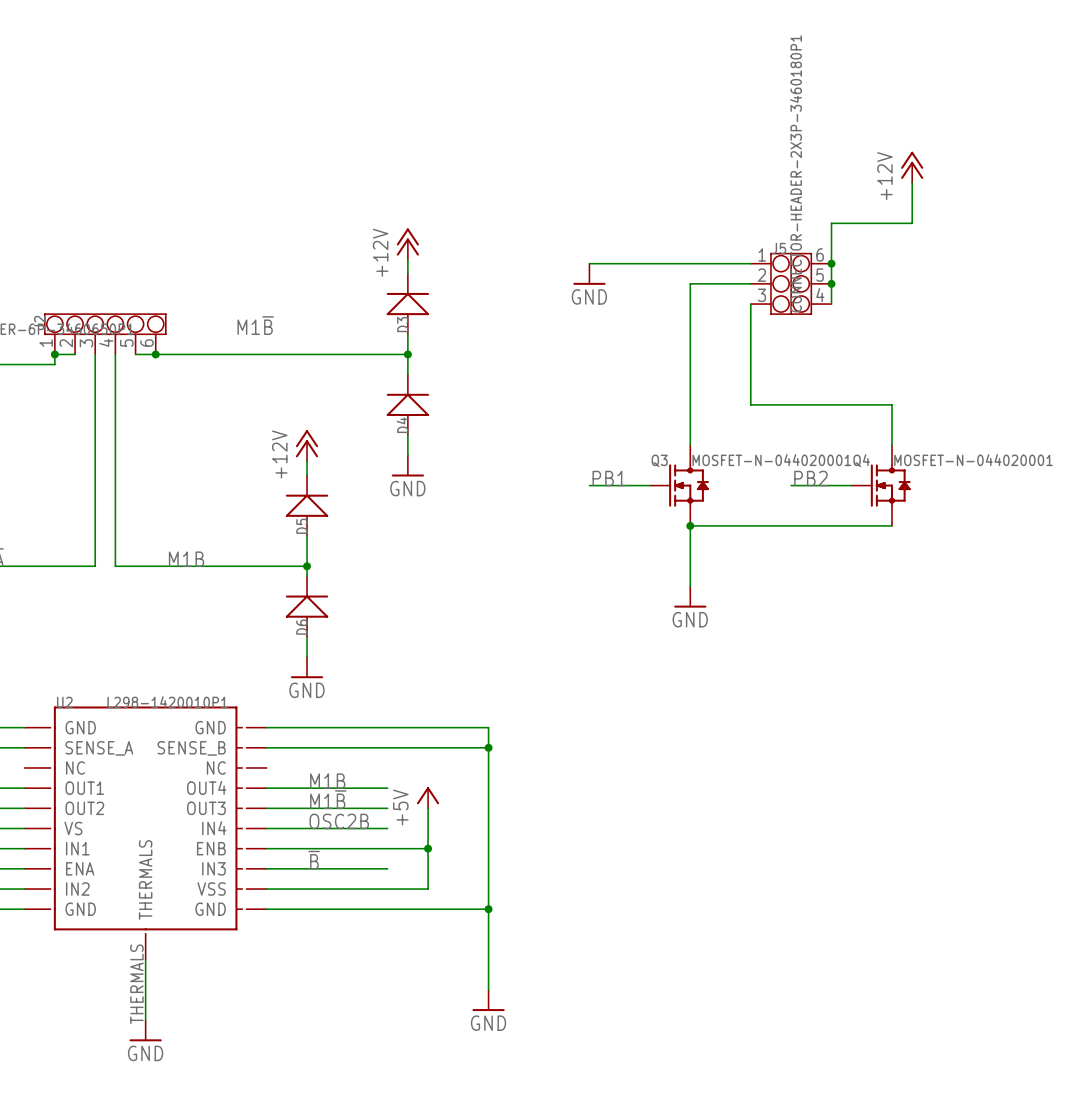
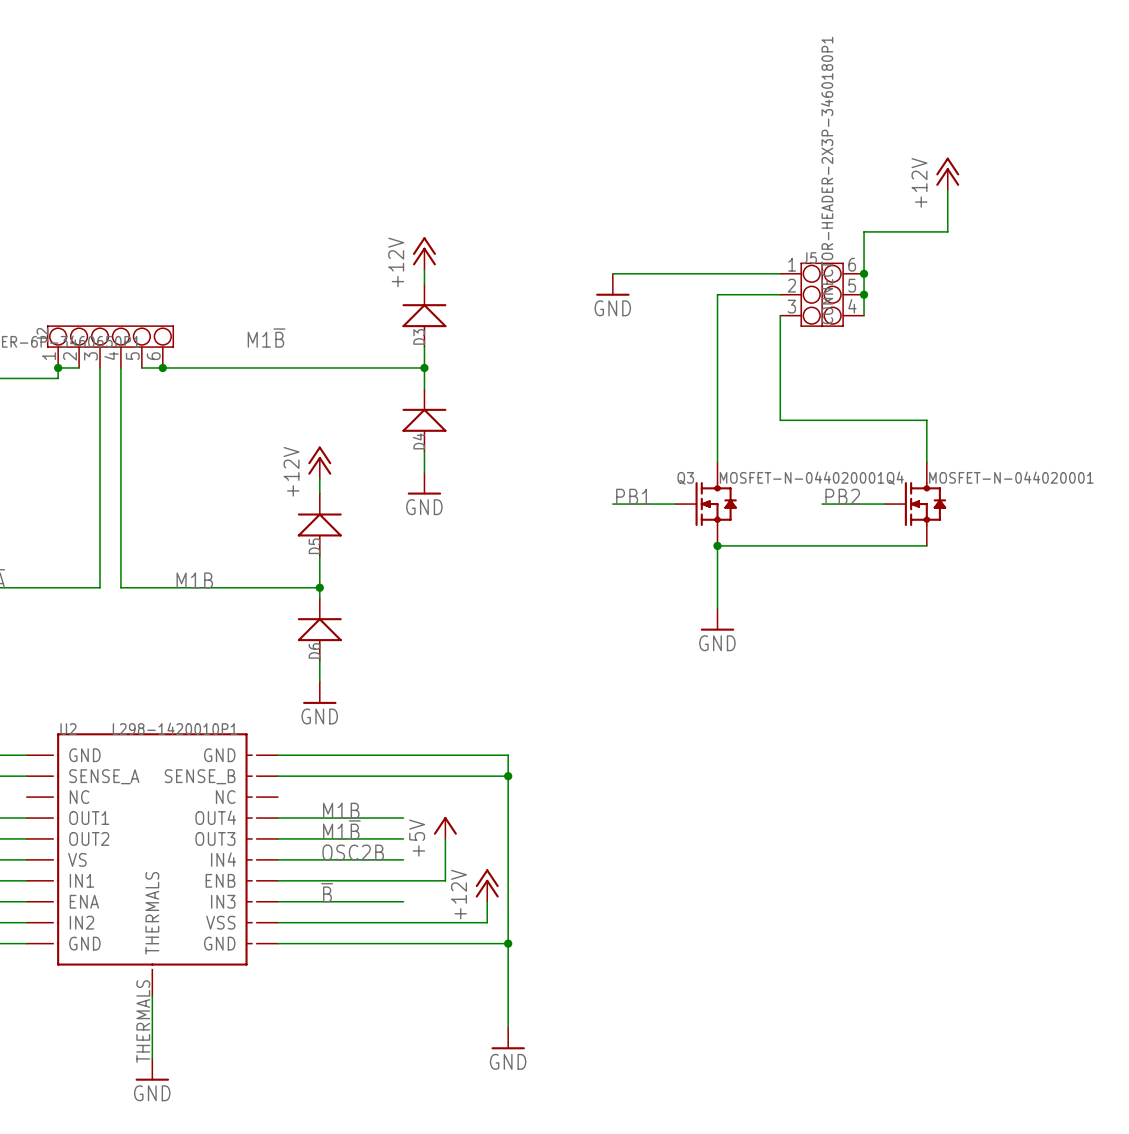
wire: (428, 848) (428, 889) -> (487, 901) (487, 922) (445, 922)
junction: (428, 848) -> none
power symbol: none -> +12V (487, 885)

